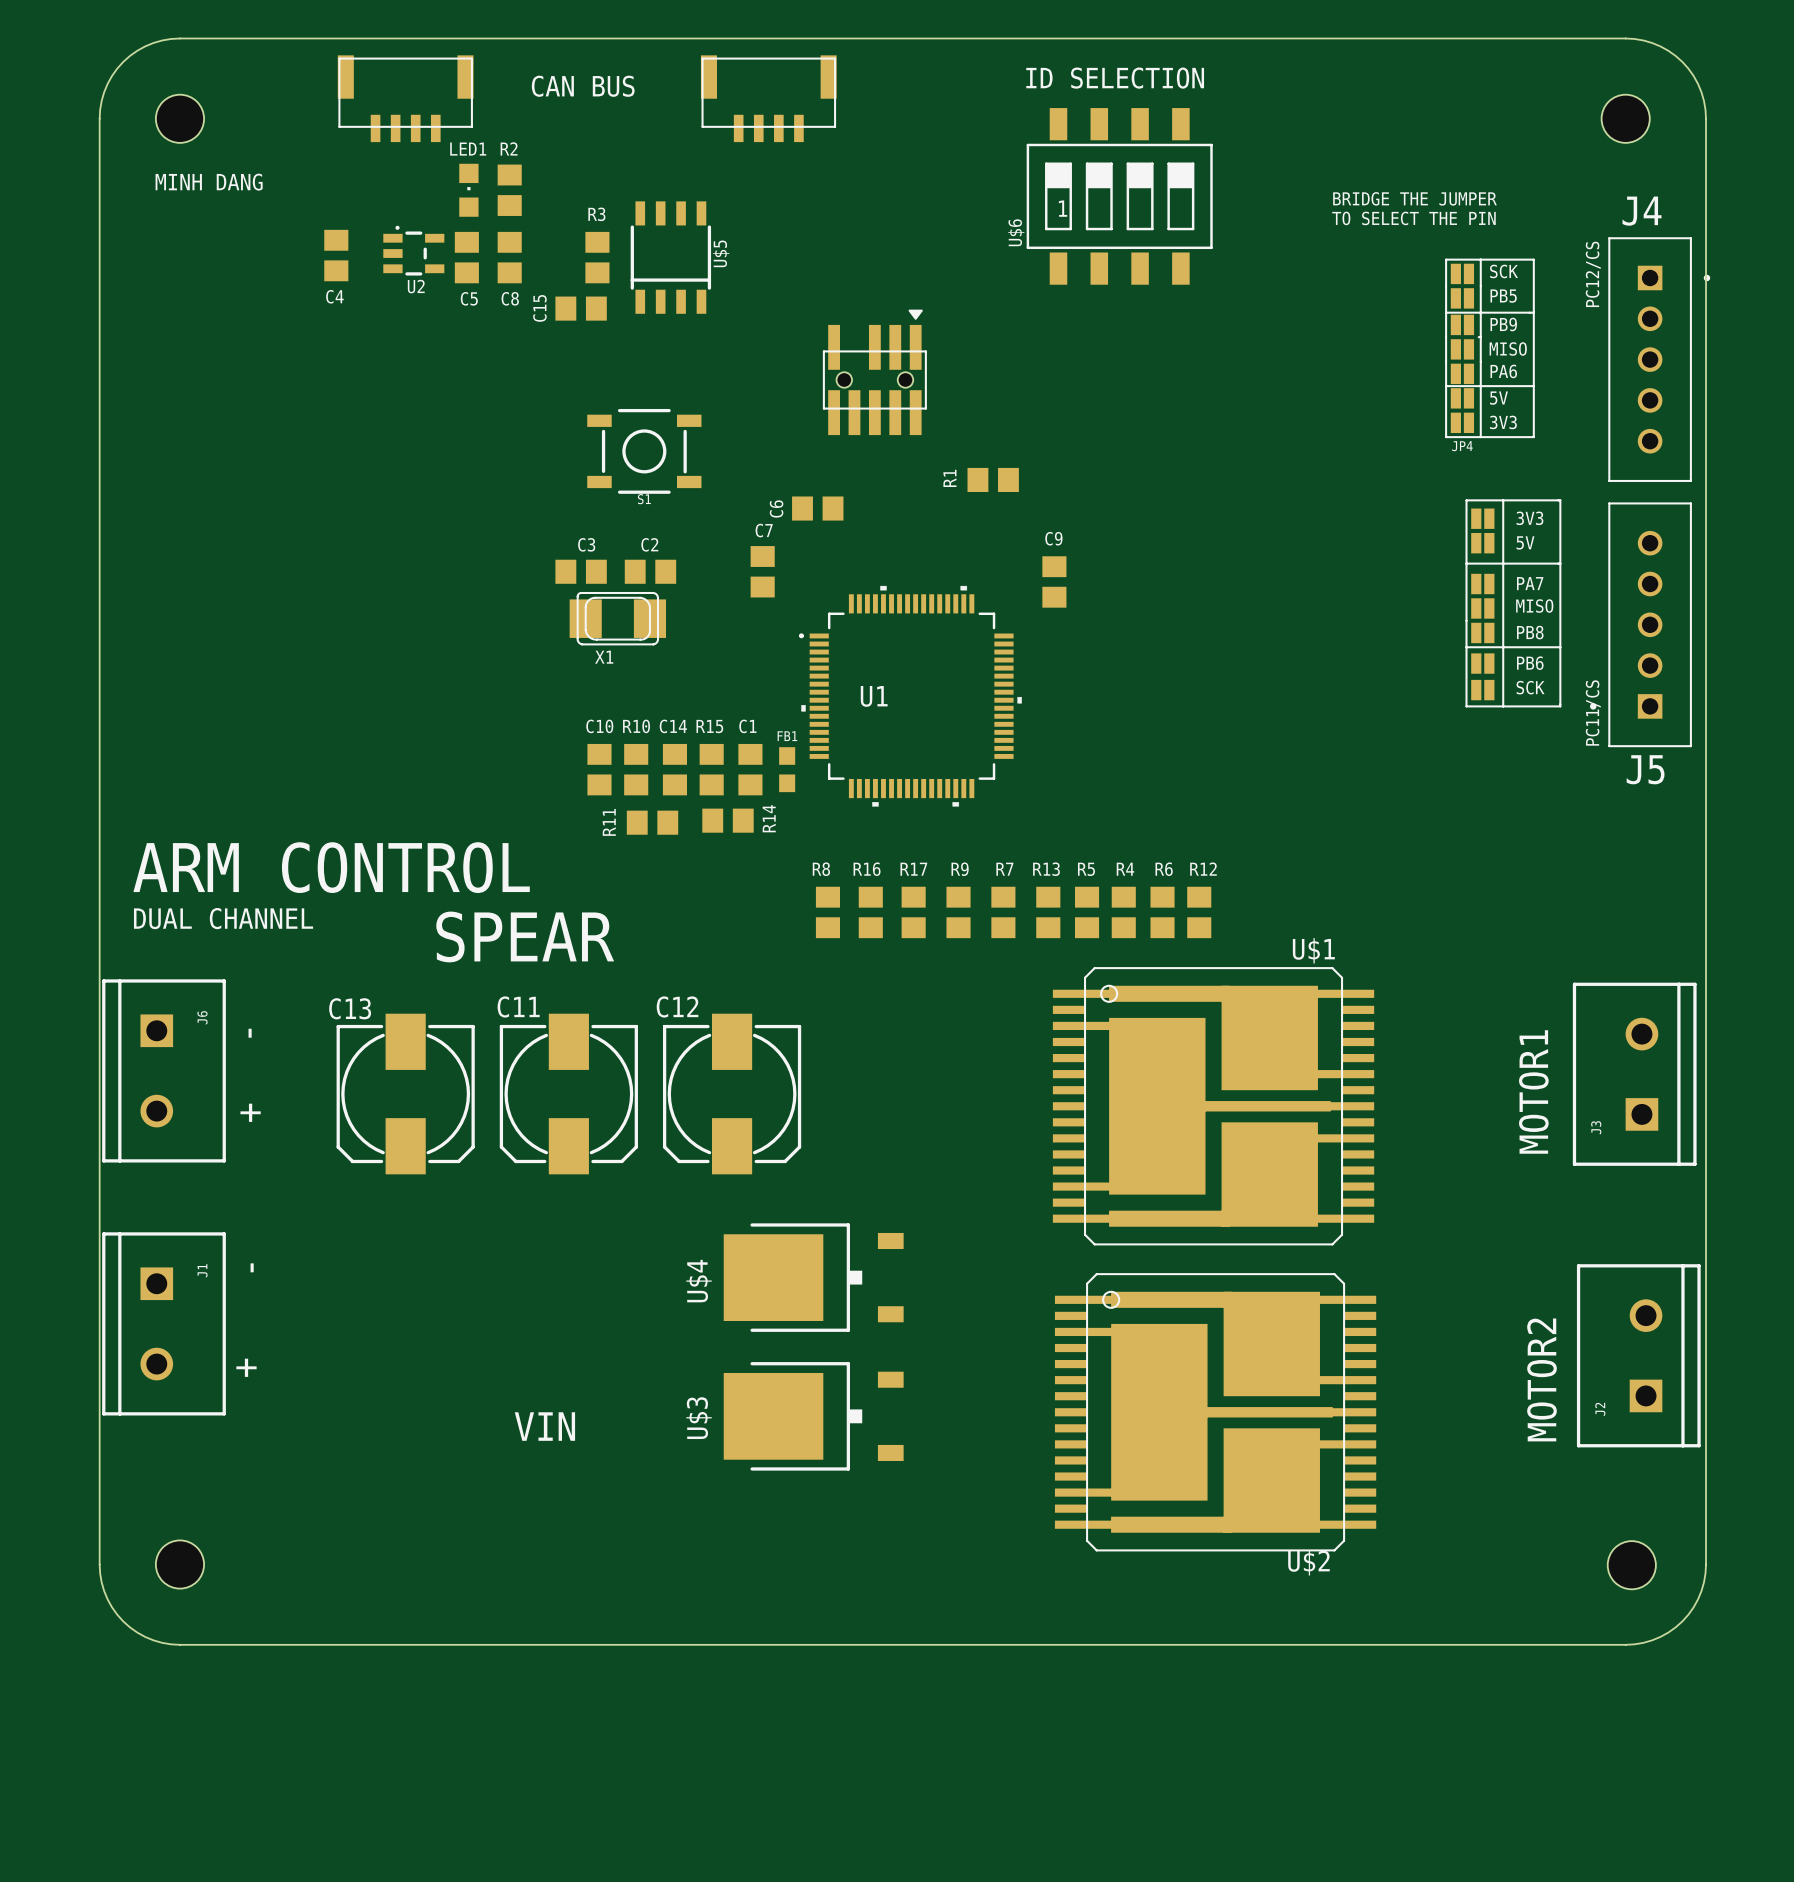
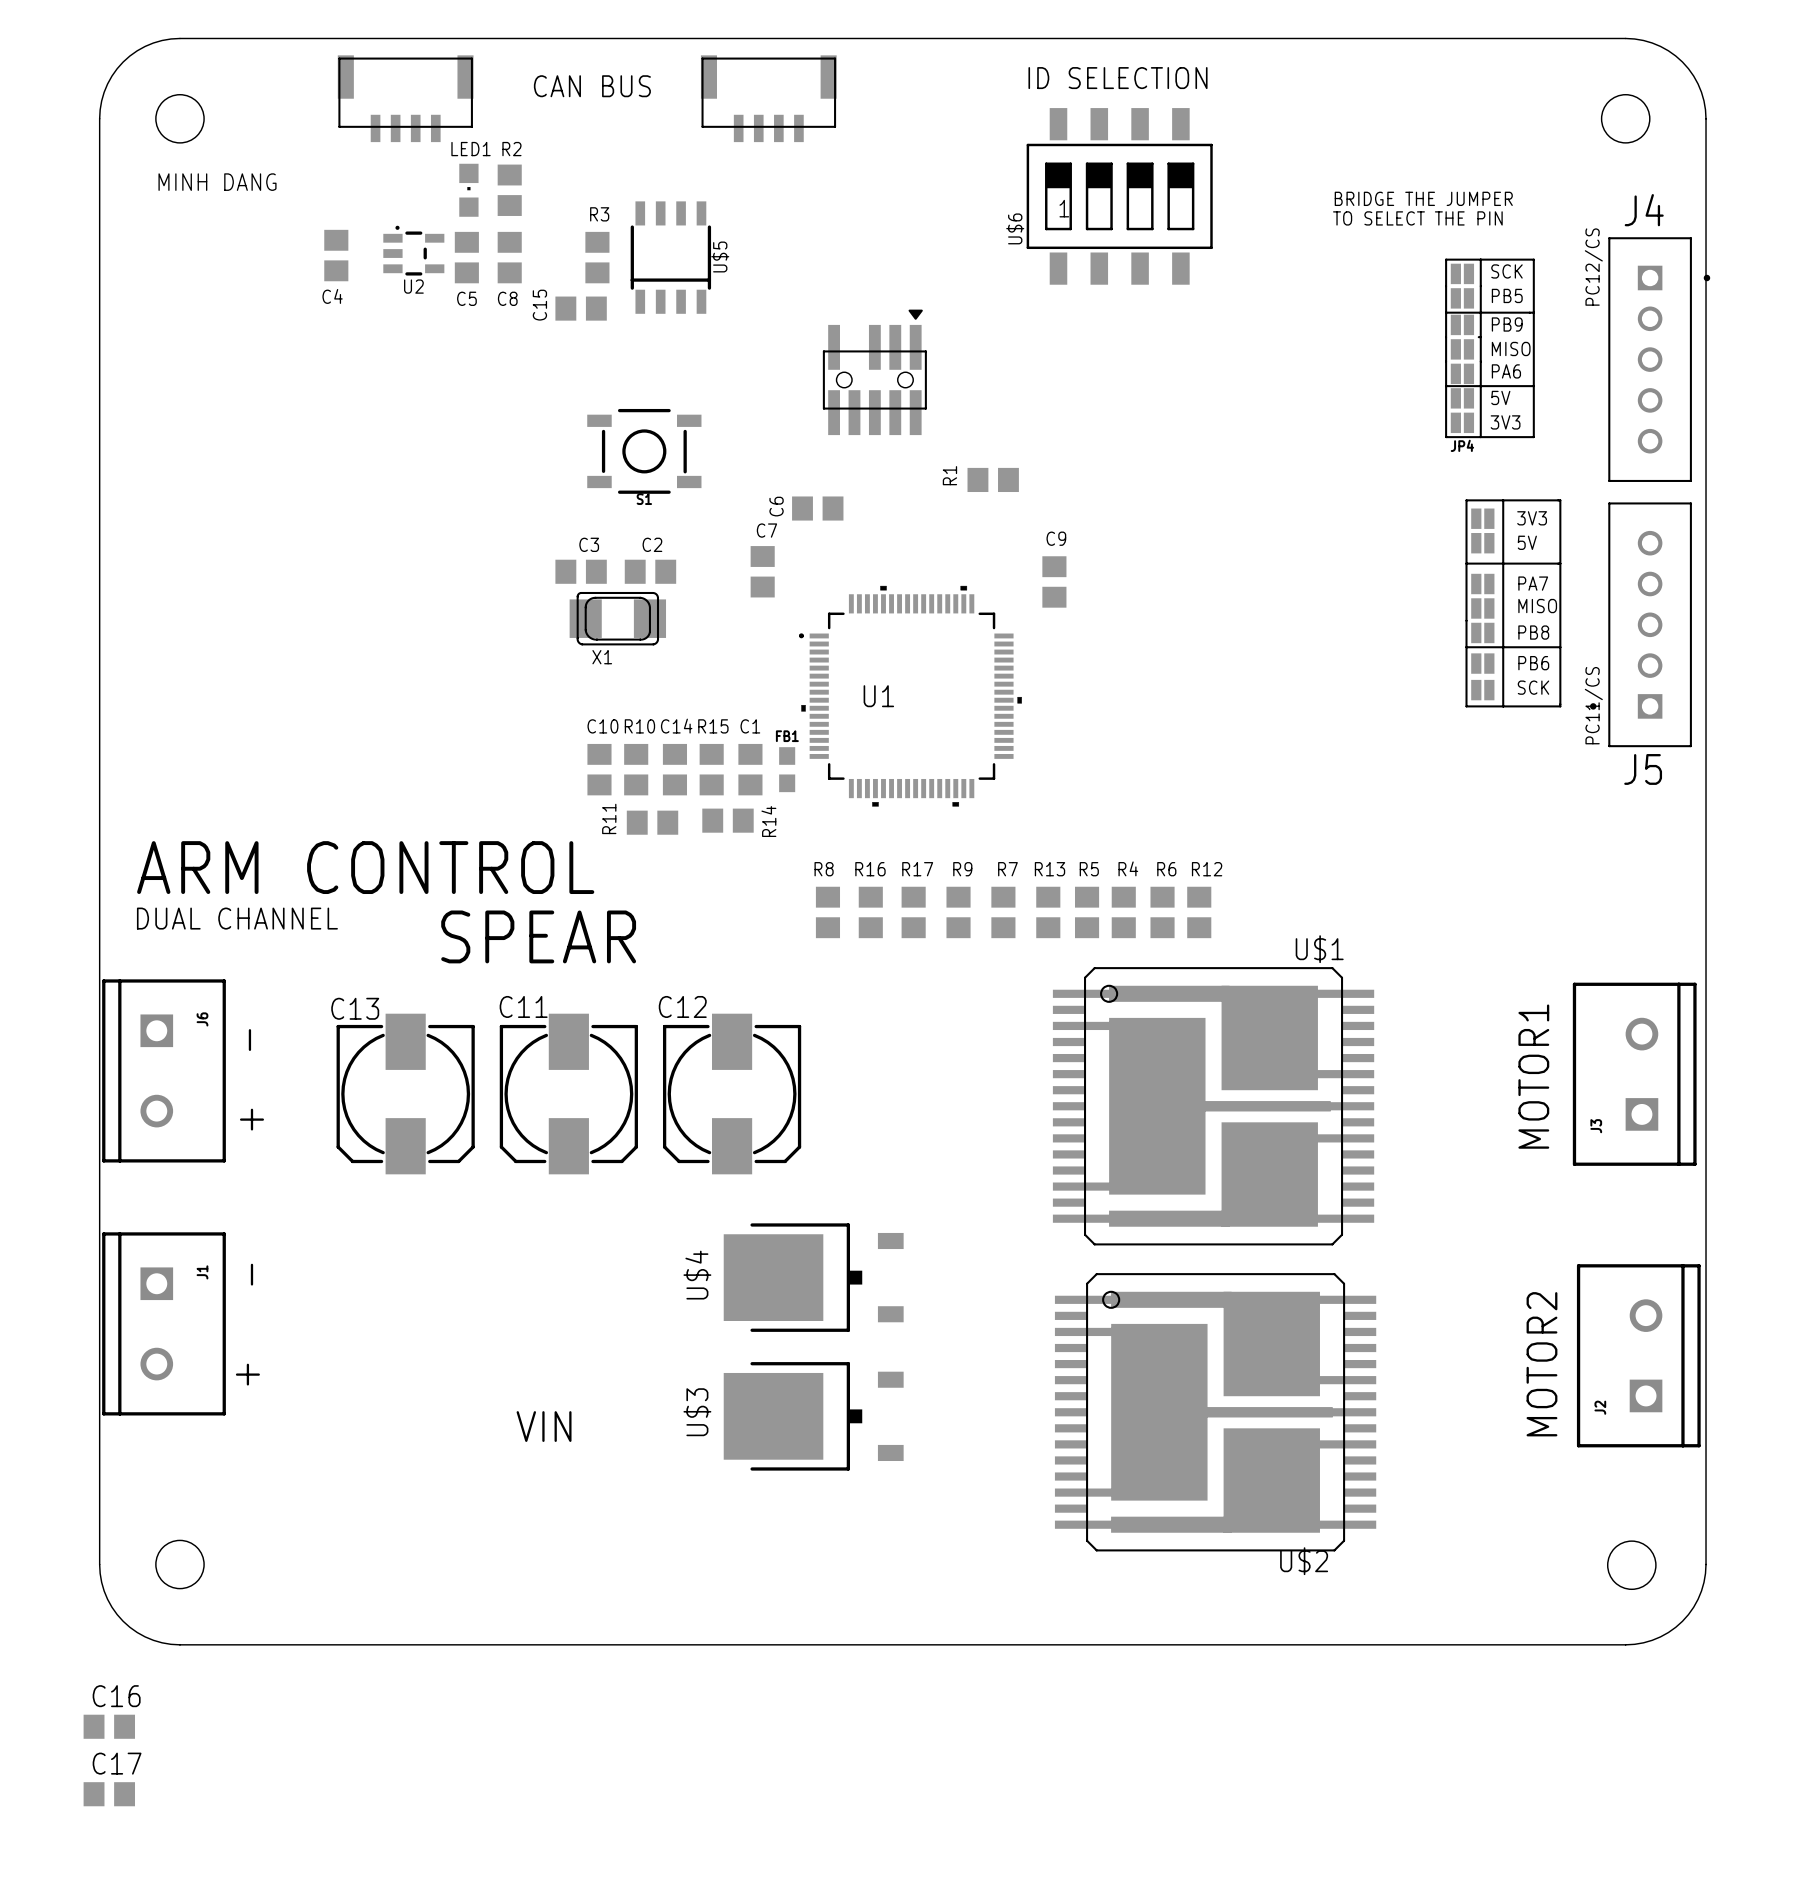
C16: none -> (109, 1726)
C17: none -> (109, 1794)

